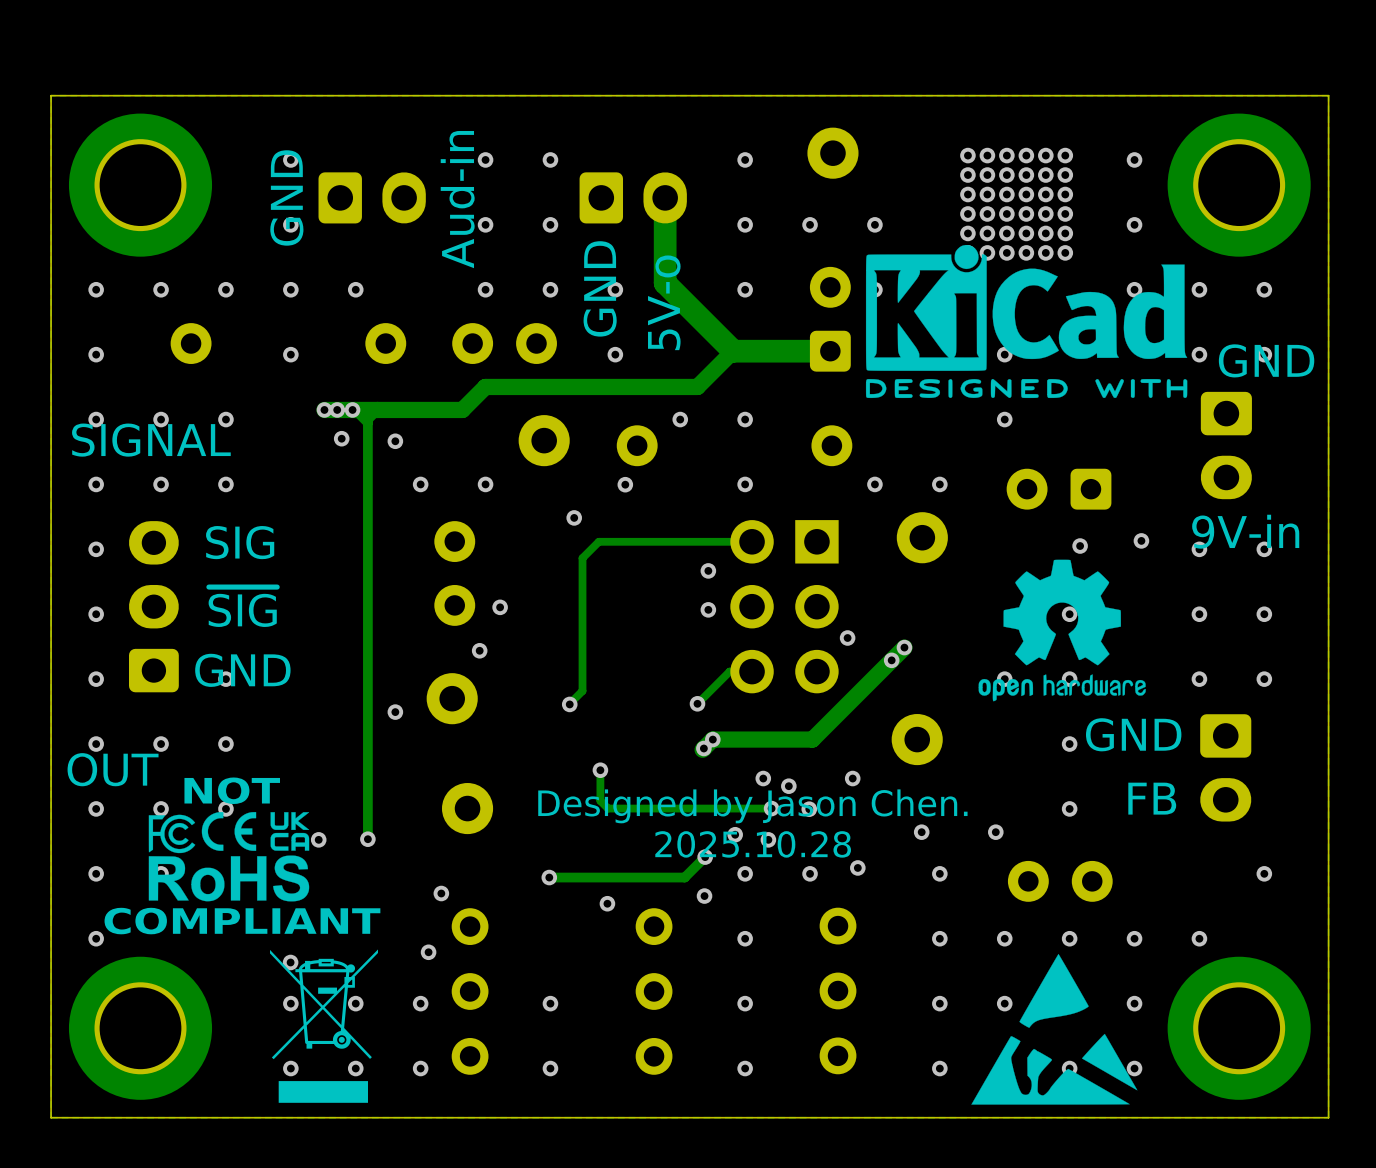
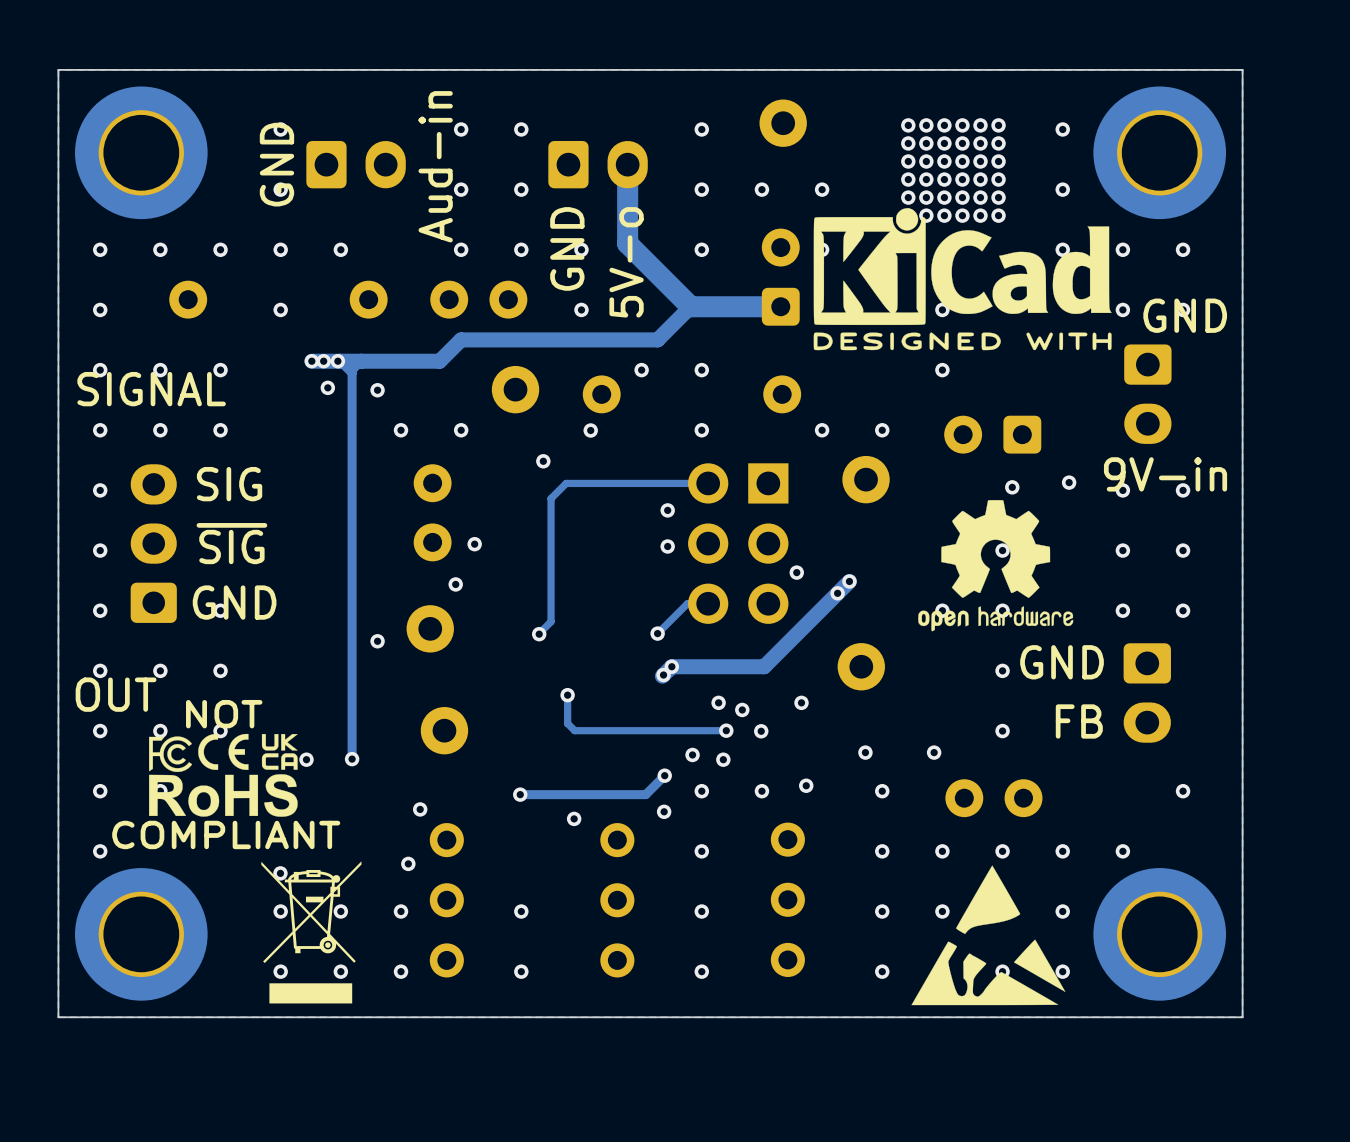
text: Designed by Jason Chen. (752, 806) -> none
text: 2025.10.28 (753, 844) -> none

